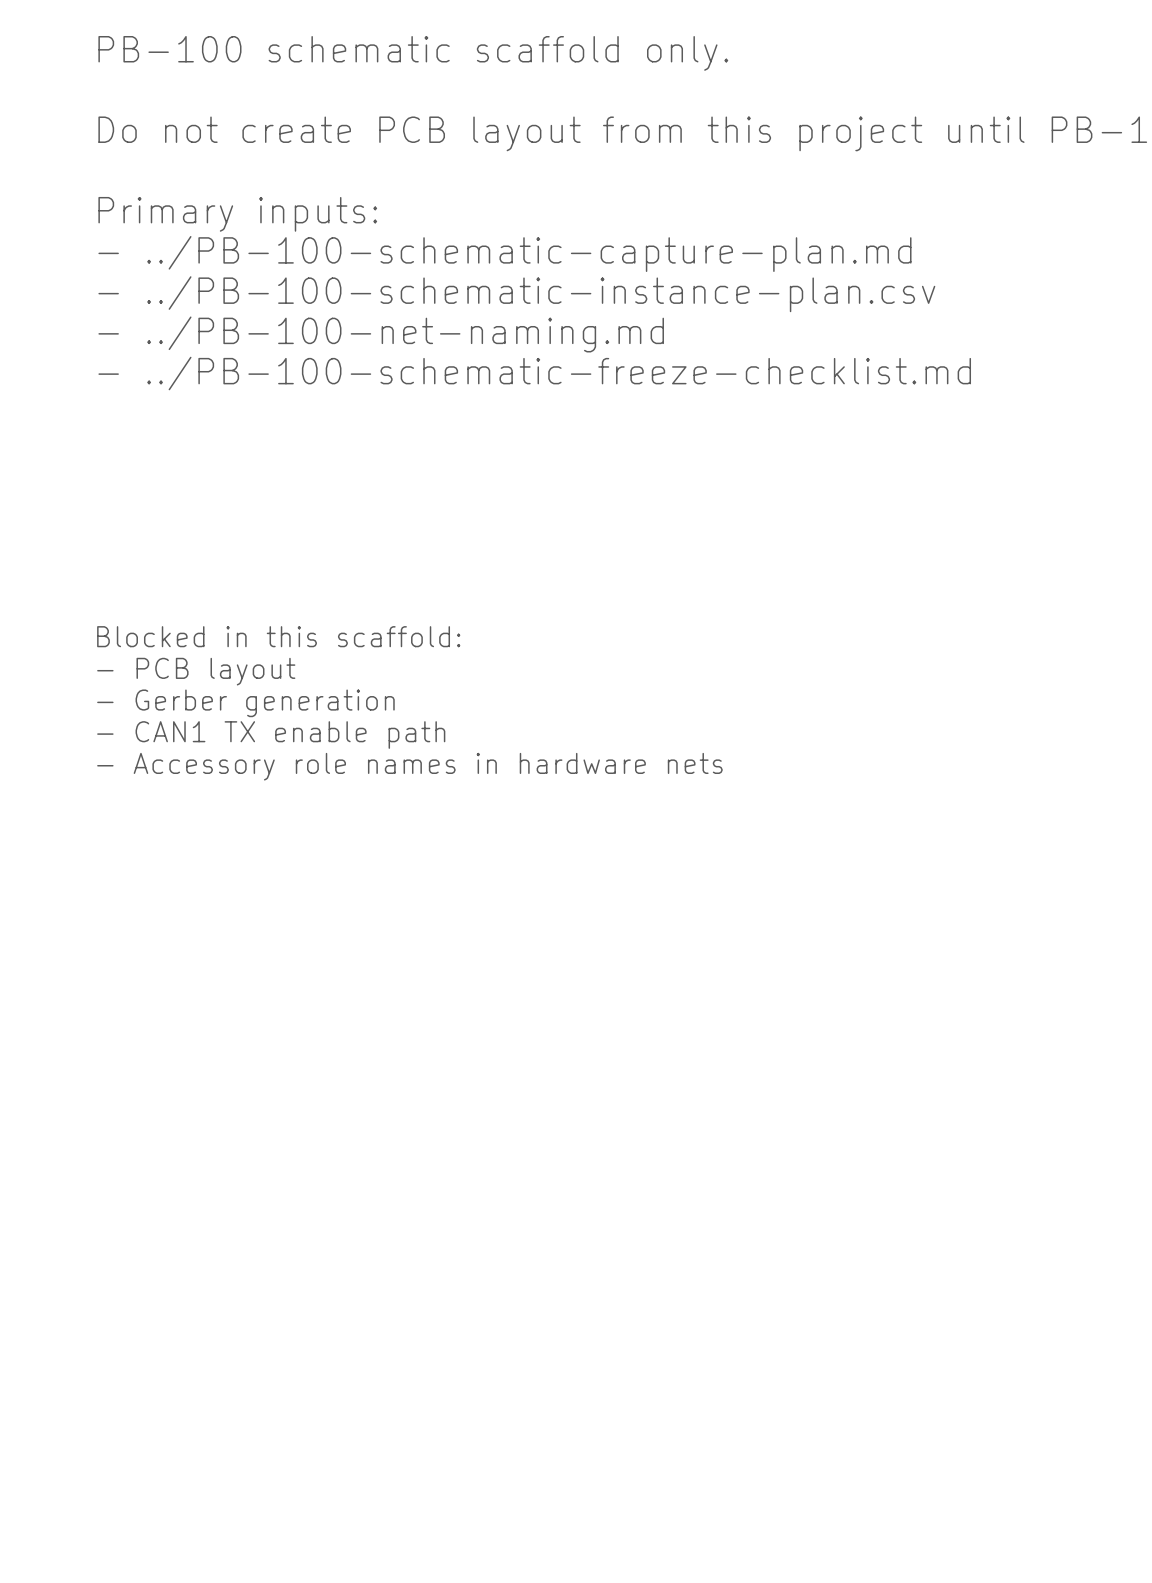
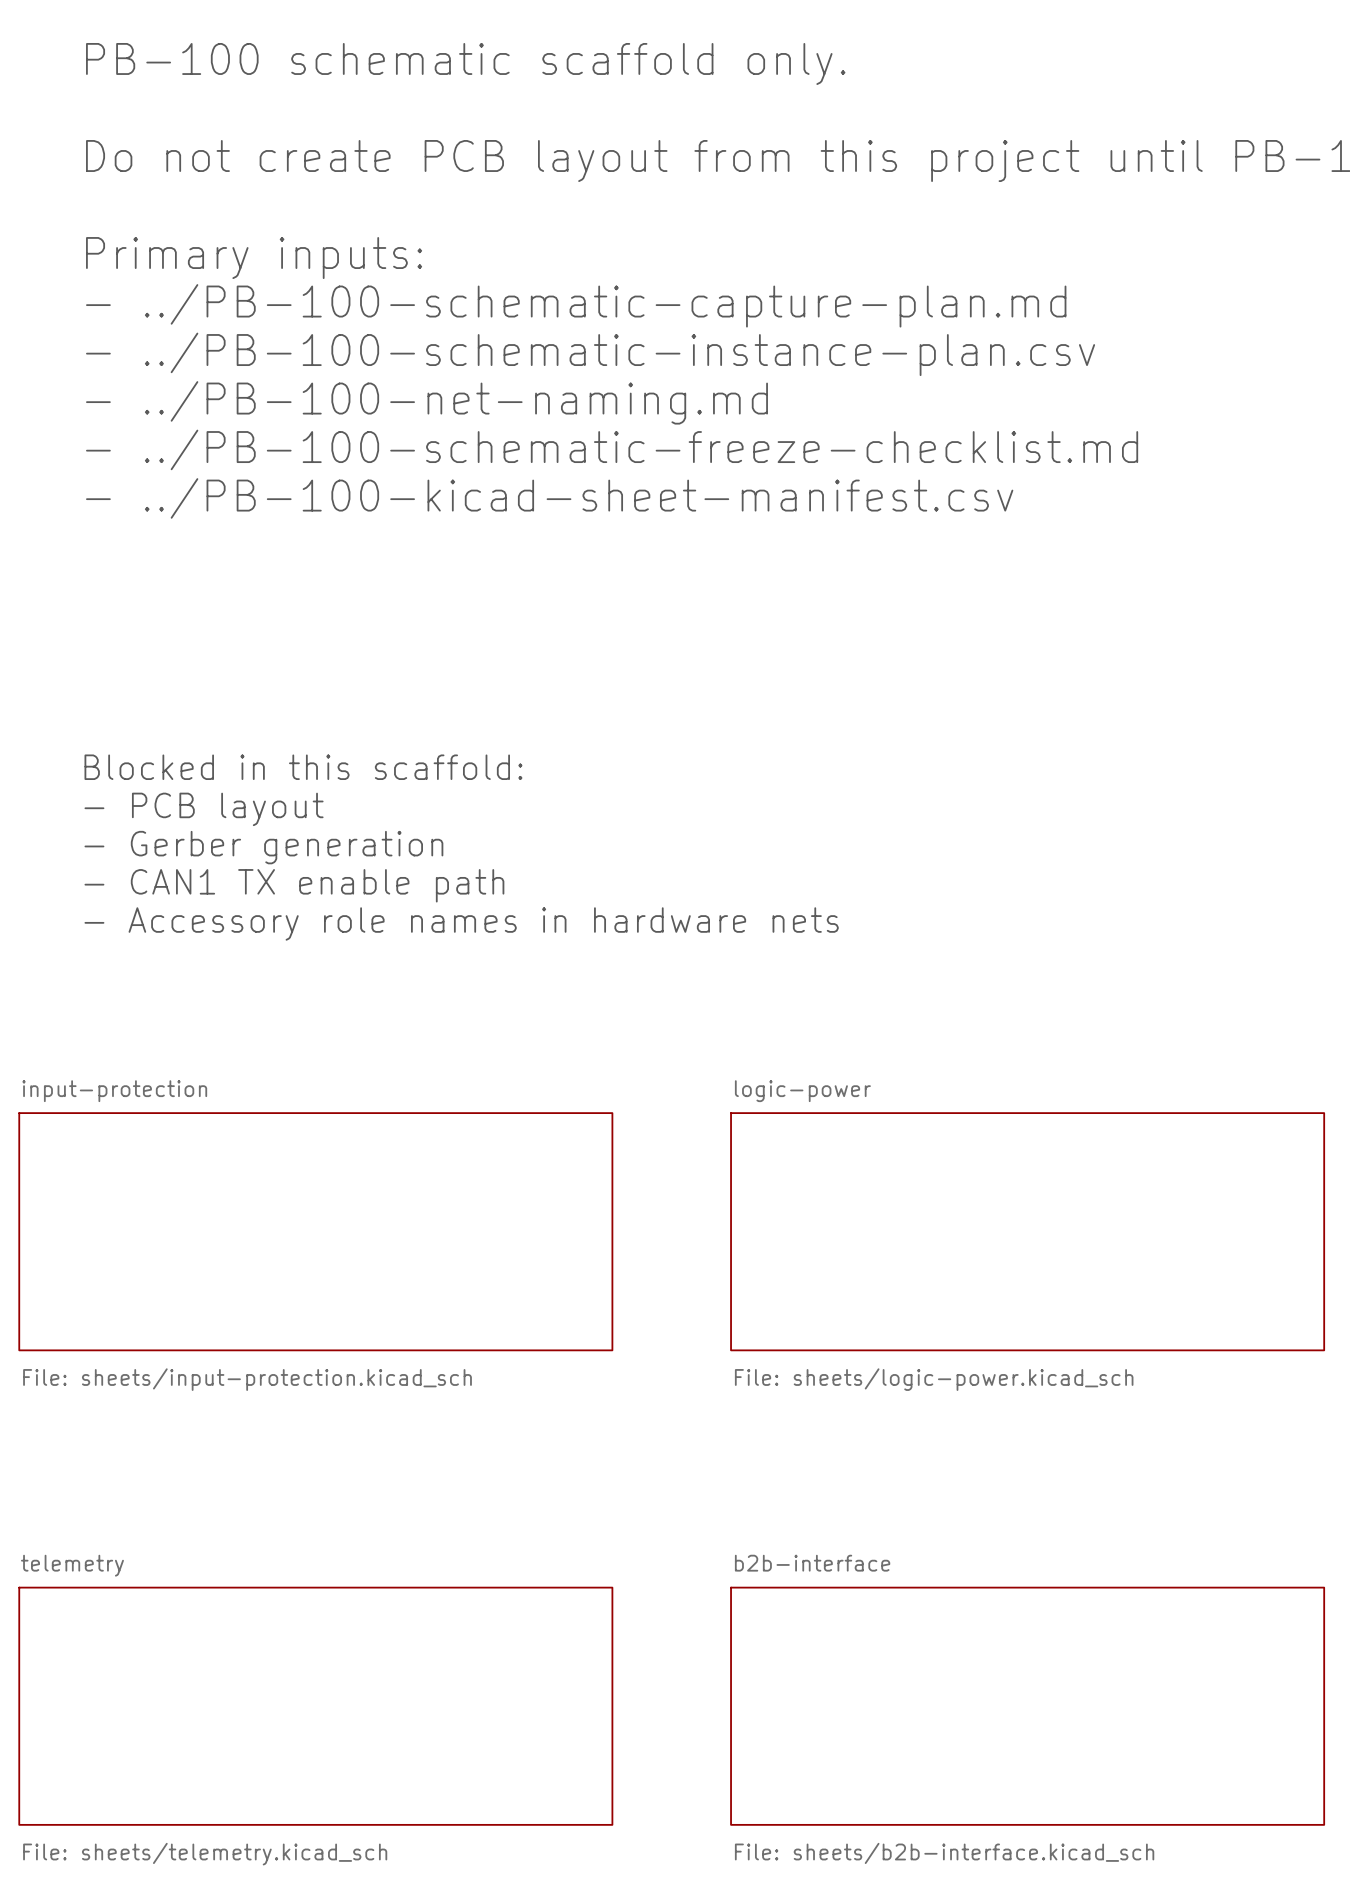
text: none -> - ../PB-100-kicad-sheet-manifest.csv (549, 498)
sheet input-protection: none -> File: sheets/input-protection.kicad_sch (315, 1231)
sheet logic-power: none -> File: sheets/logic-power.kicad_sch (1027, 1231)
sheet telemetry: none -> File: sheets/telemetry.kicad_sch (315, 1706)
sheet b2b-interface: none -> File: sheets/b2b-interface.kicad_sch (1027, 1706)

